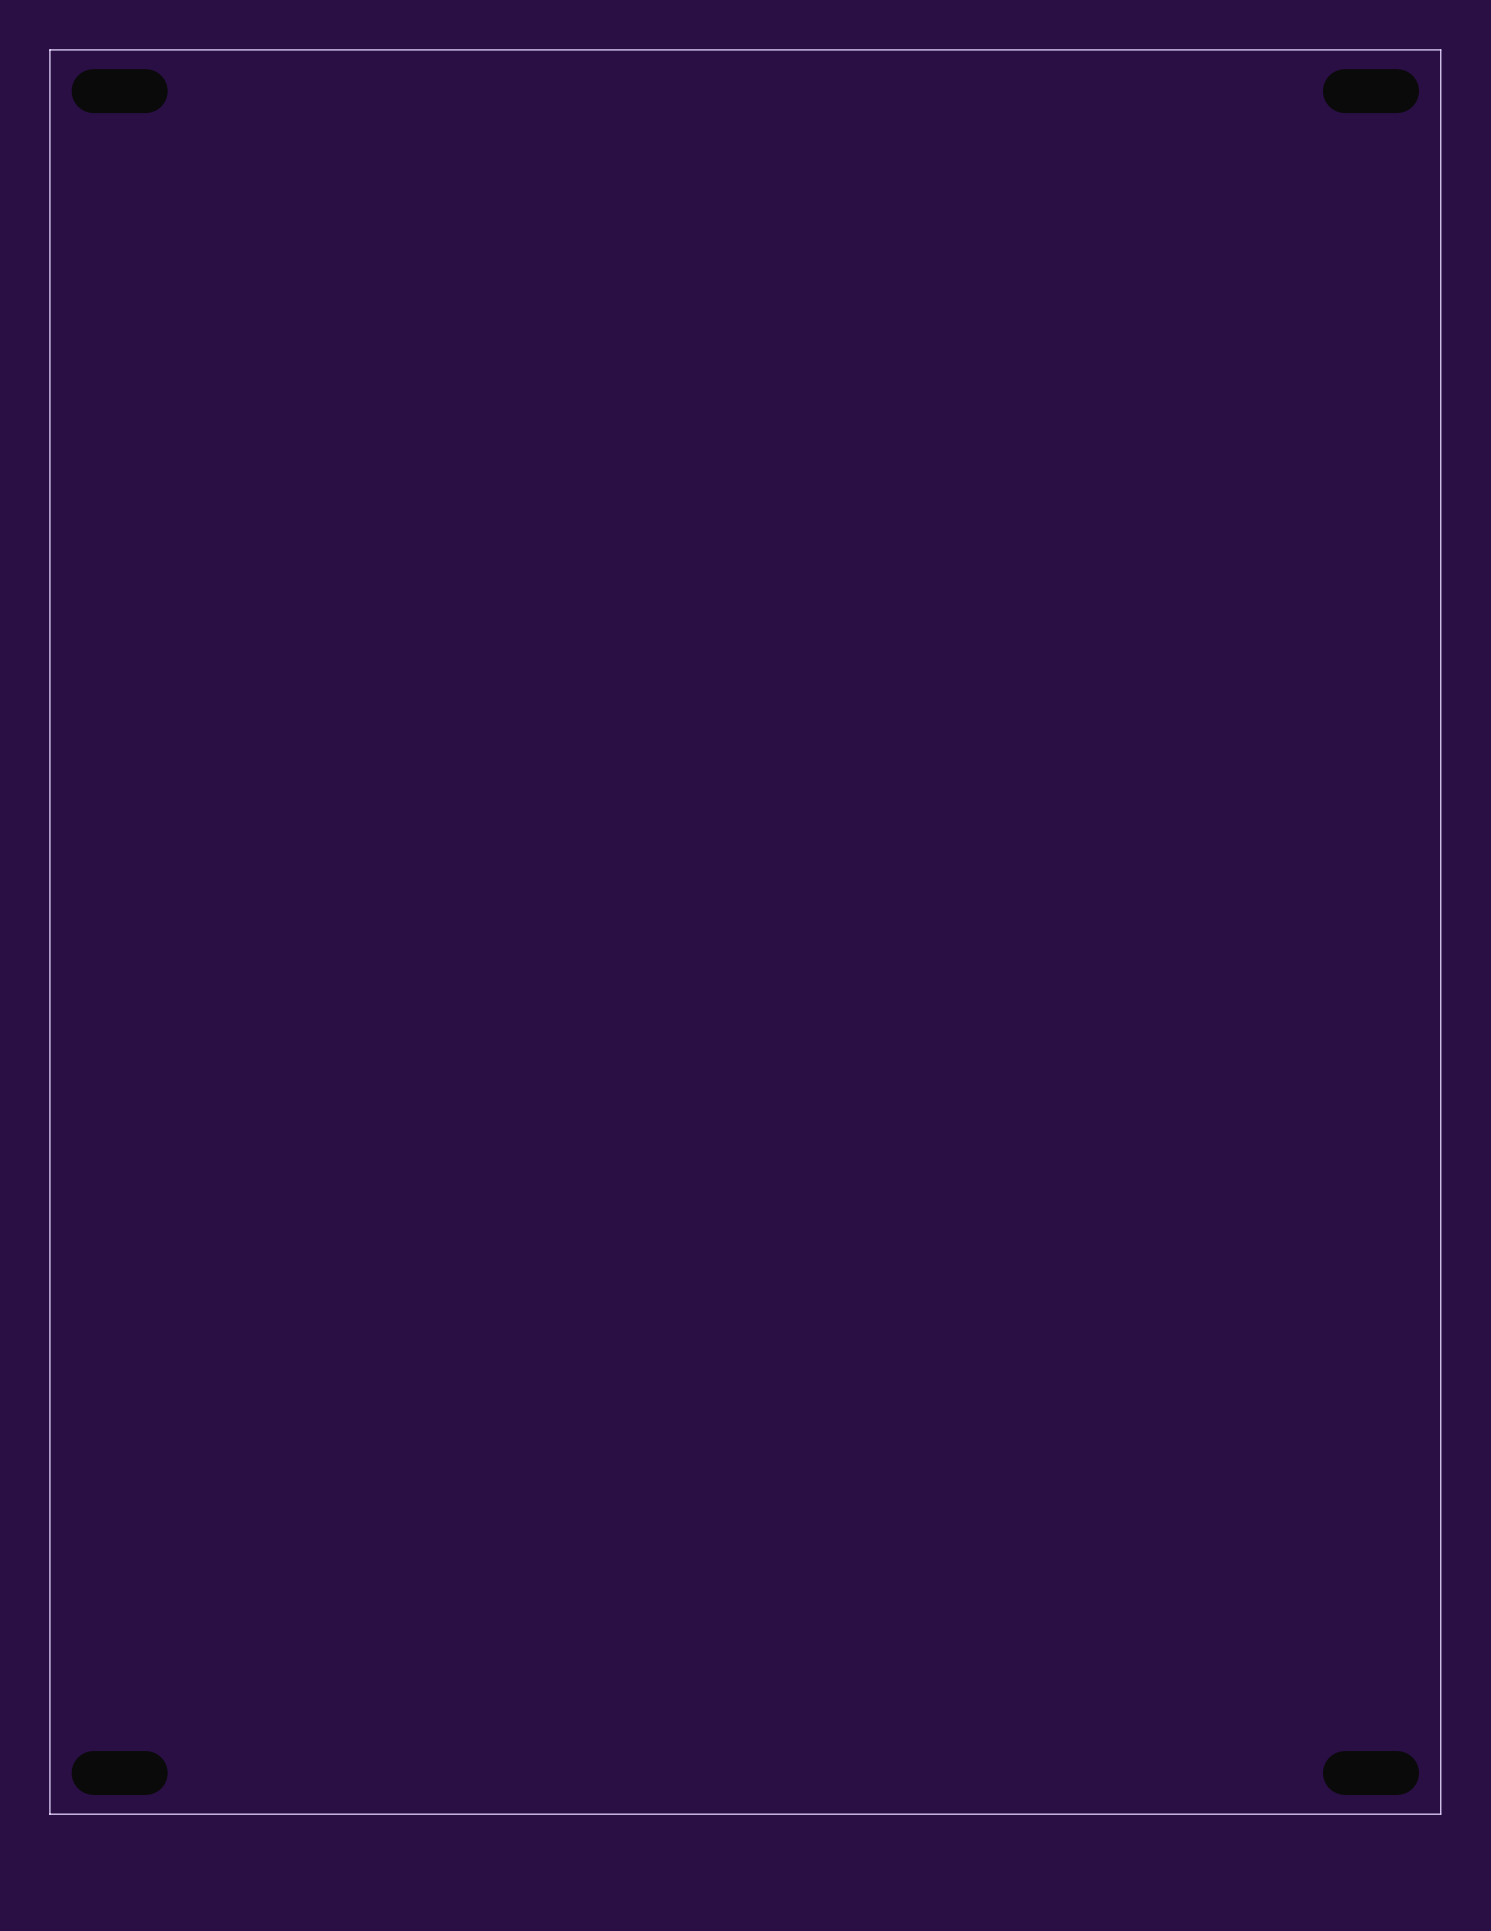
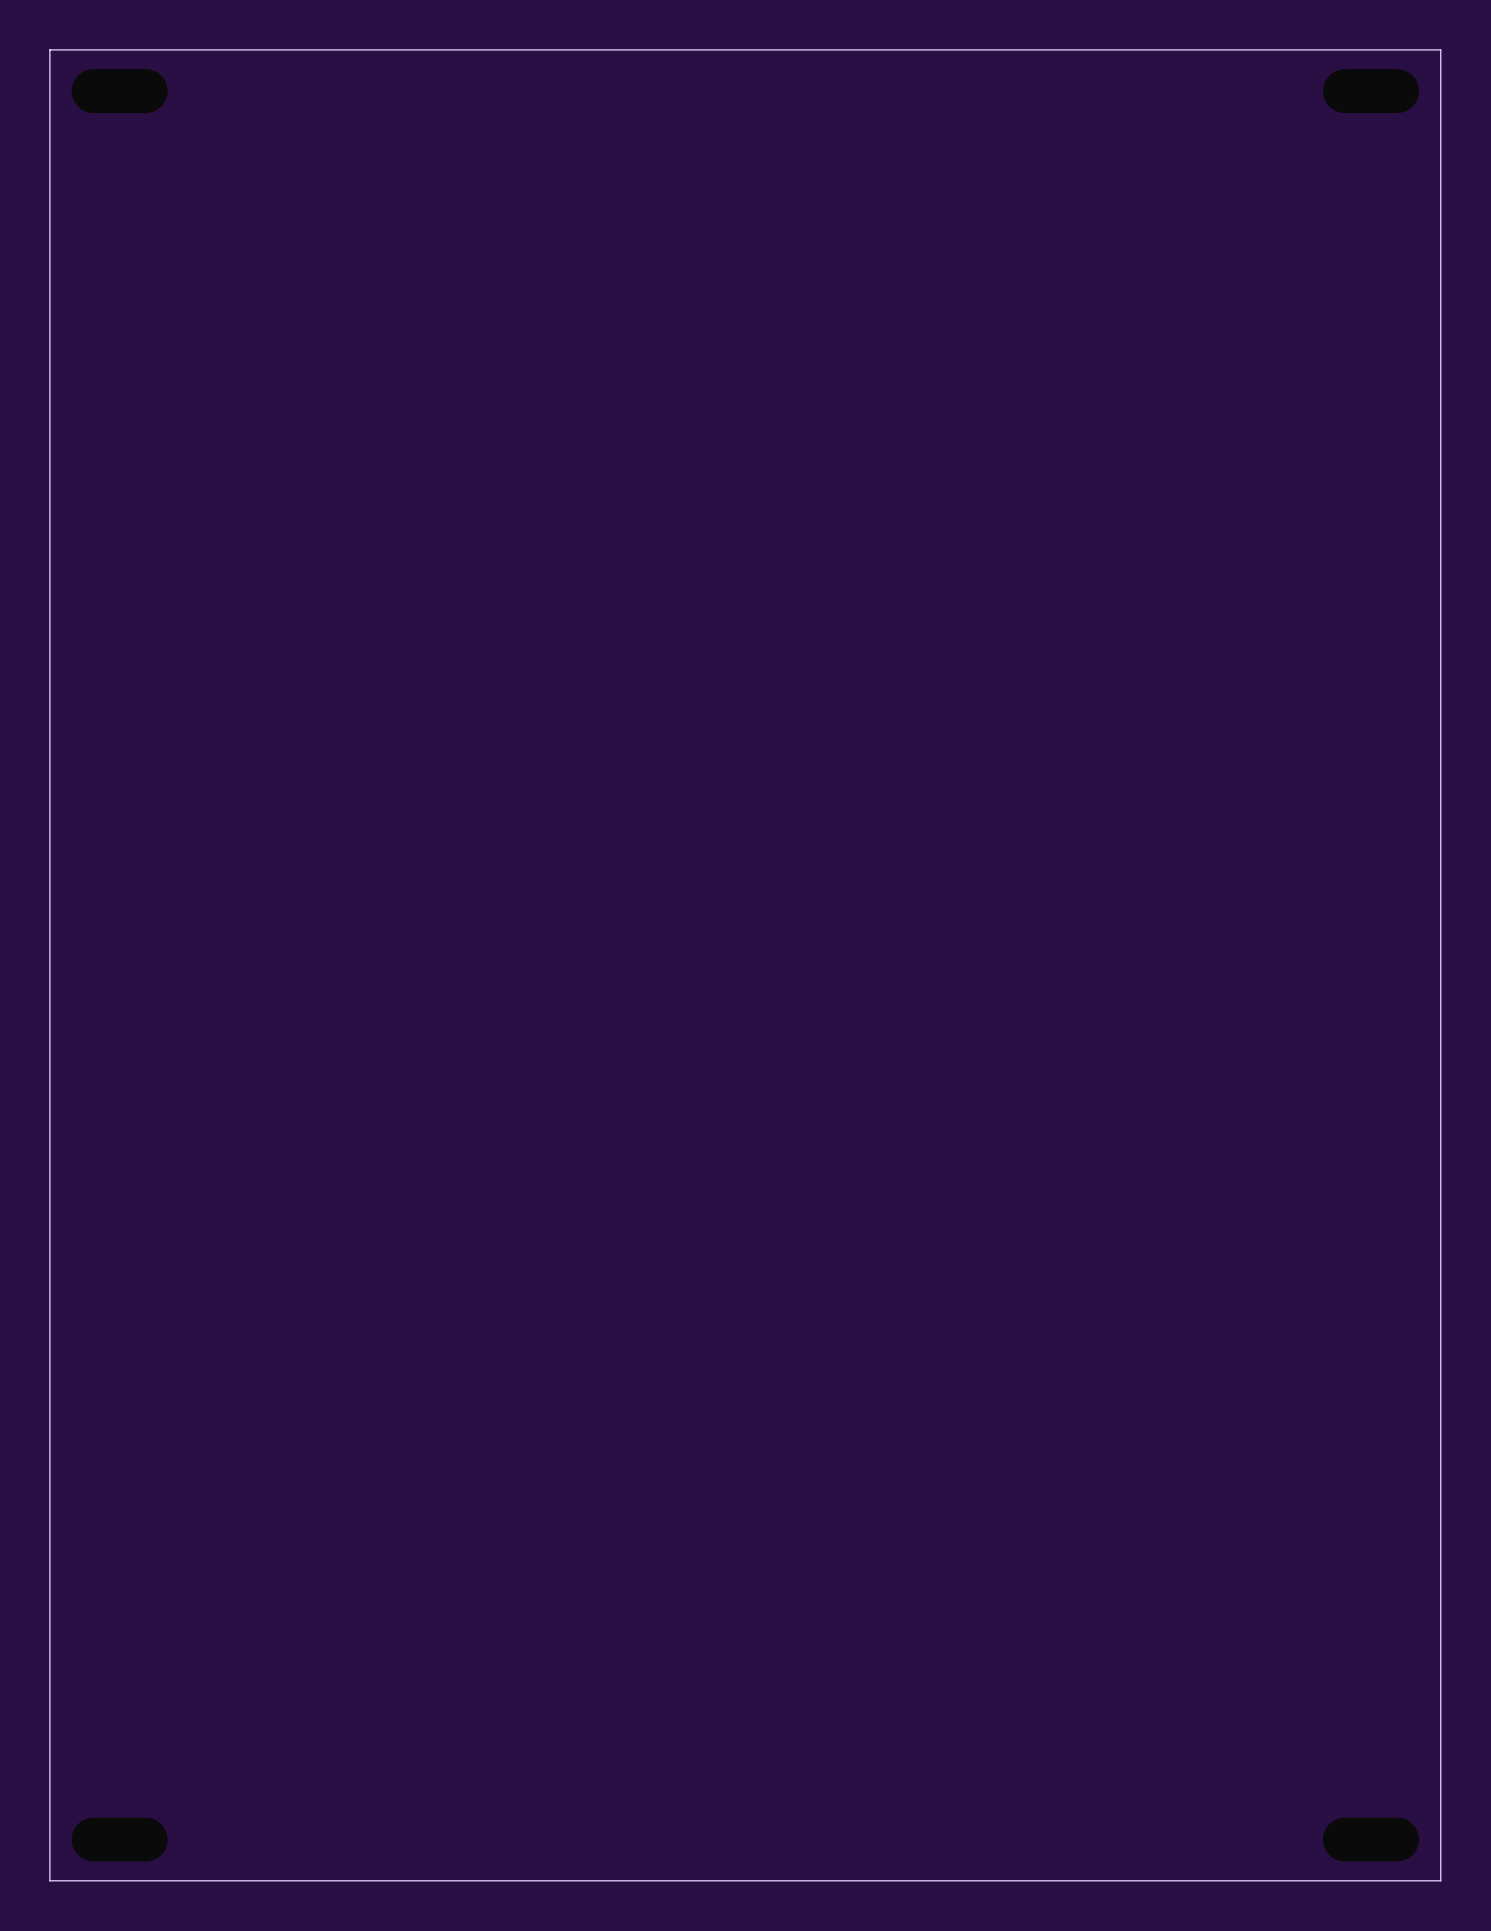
part position: (119, 1773) -> (119, 1839)
part position: (1370, 1773) -> (1370, 1839)
board edge: (49, 1814) (1440, 1814) -> (49, 1814) (49, 1880) (1440, 1880) (1440, 1814)

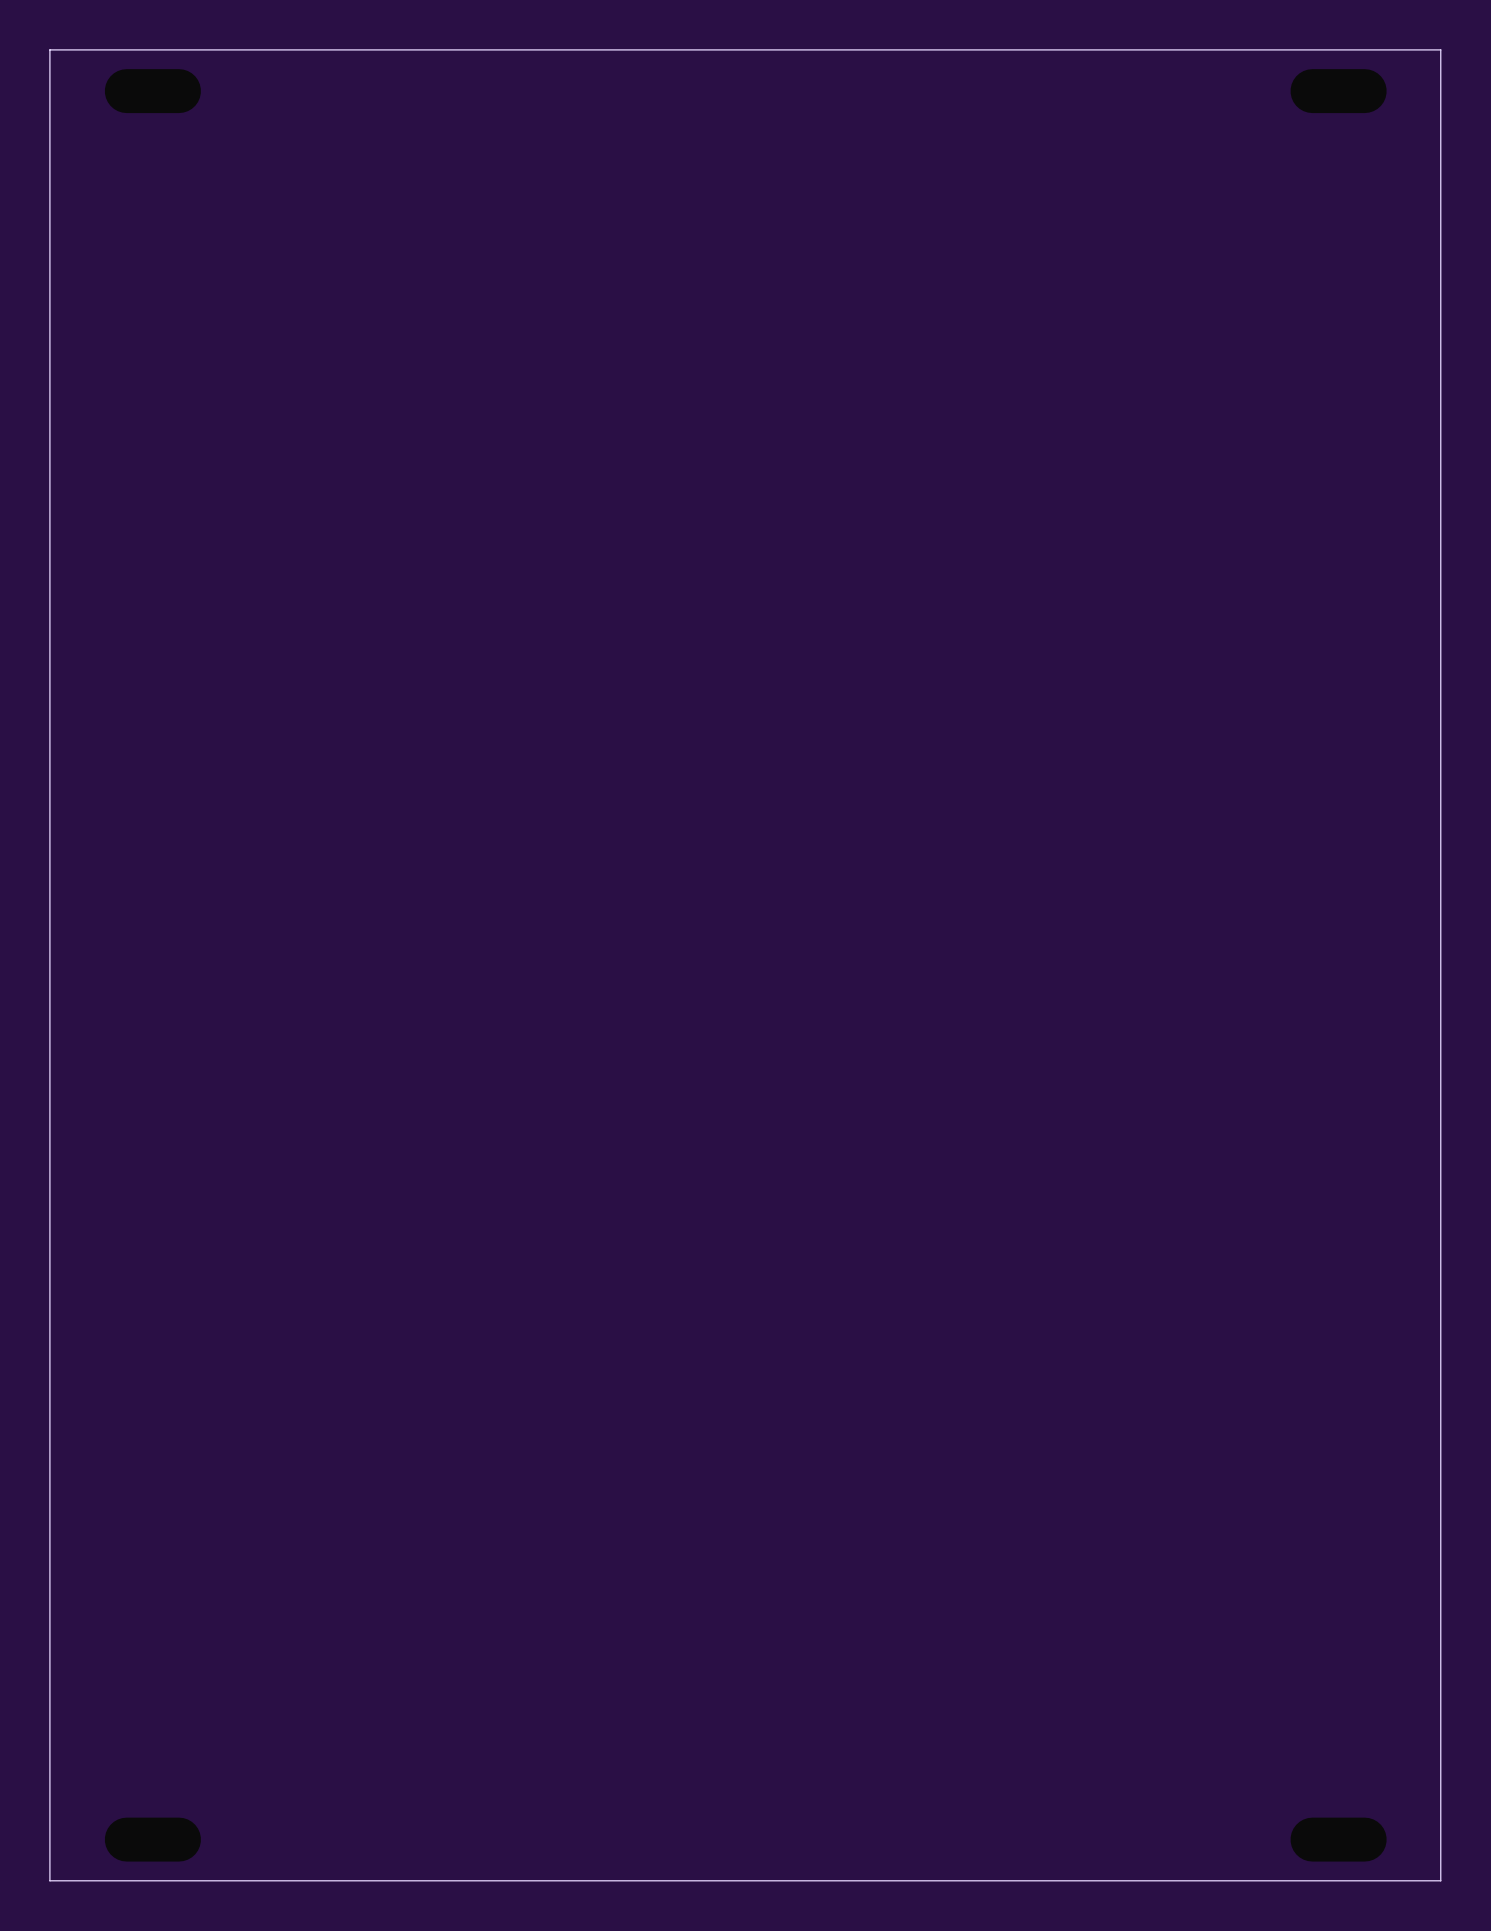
part position: (119, 91) -> (152, 91)
part position: (1370, 91) -> (1338, 91)
part position: (119, 1839) -> (152, 1839)
part position: (1370, 1839) -> (1338, 1839)

